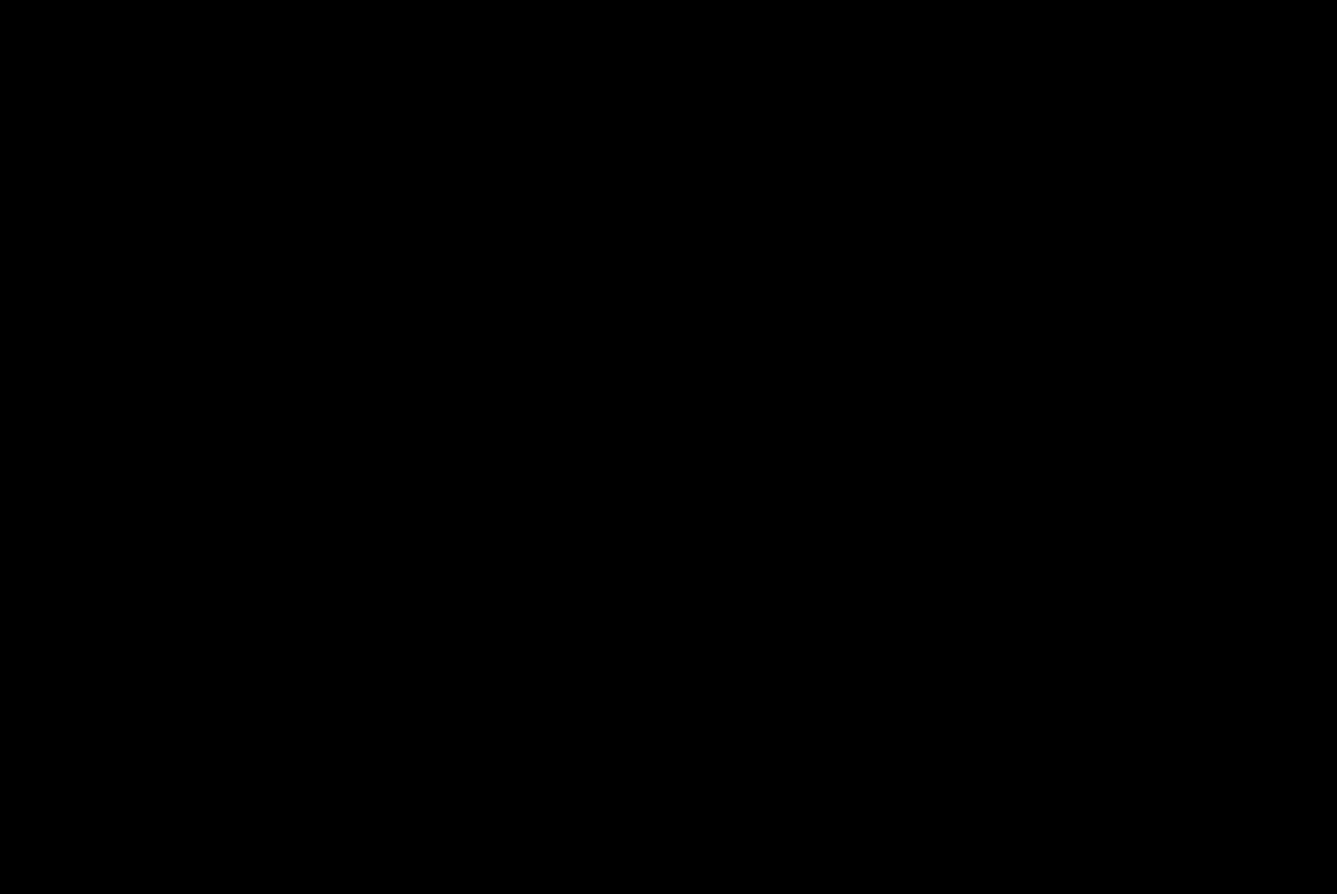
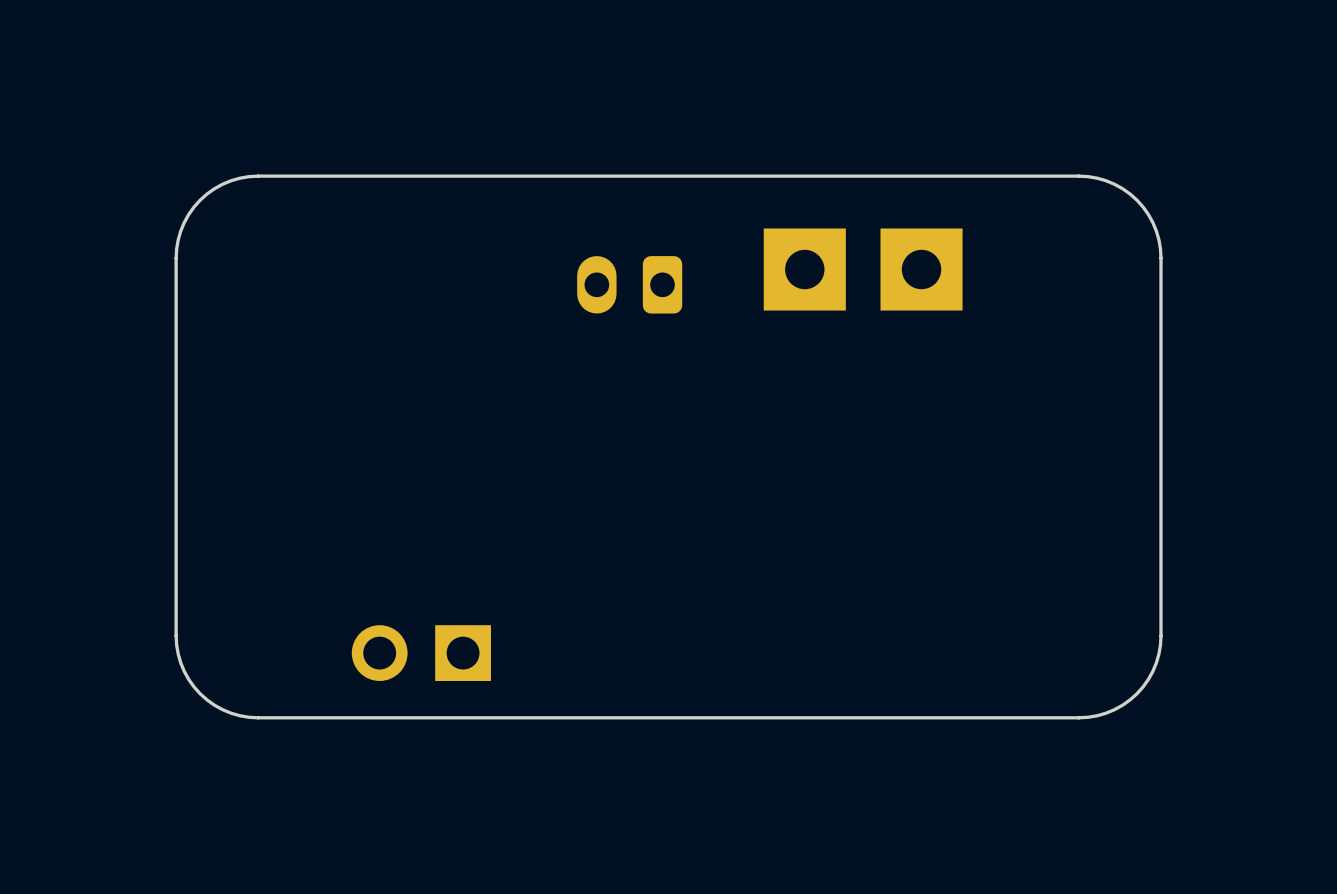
board edge: none -> (1078, 176) (258, 176) (231, 180) (214, 188) (200, 200) (188, 214) (180, 231) (176, 258) (176, 635) (180, 662) (188, 679) (207, 699) (222, 709) (239, 715) (258, 717) (1078, 717) (1106, 713) (1122, 705) (1136, 693) (1148, 679) (1156, 662) (1160, 644) (1160, 249) (1152, 222) (1136, 200) (1114, 184) (1097, 178) (1078, 176)
part: none -> (804, 269)
part: none -> (921, 269)
part: none -> (629, 284)
part: none -> (421, 653)

